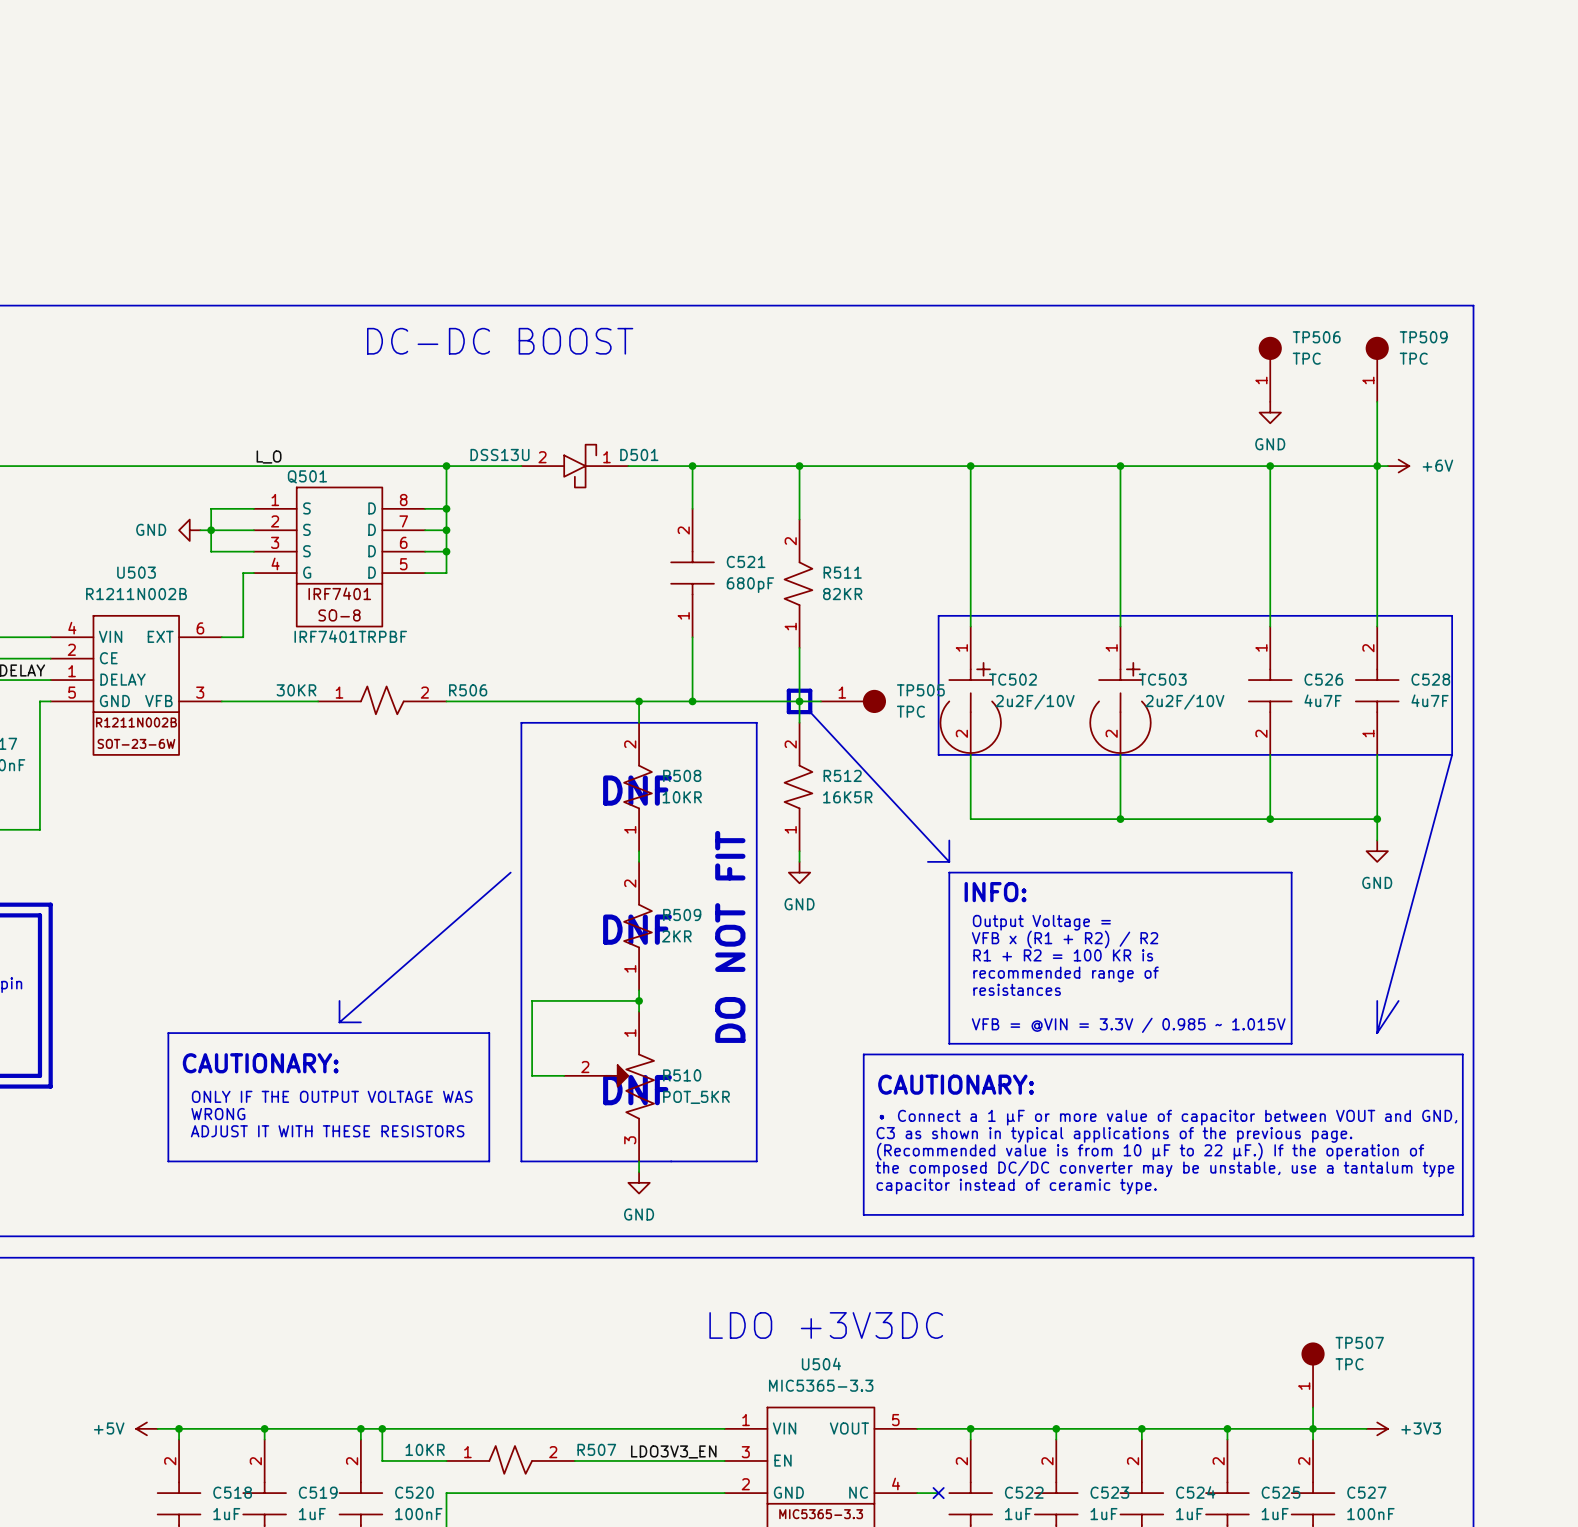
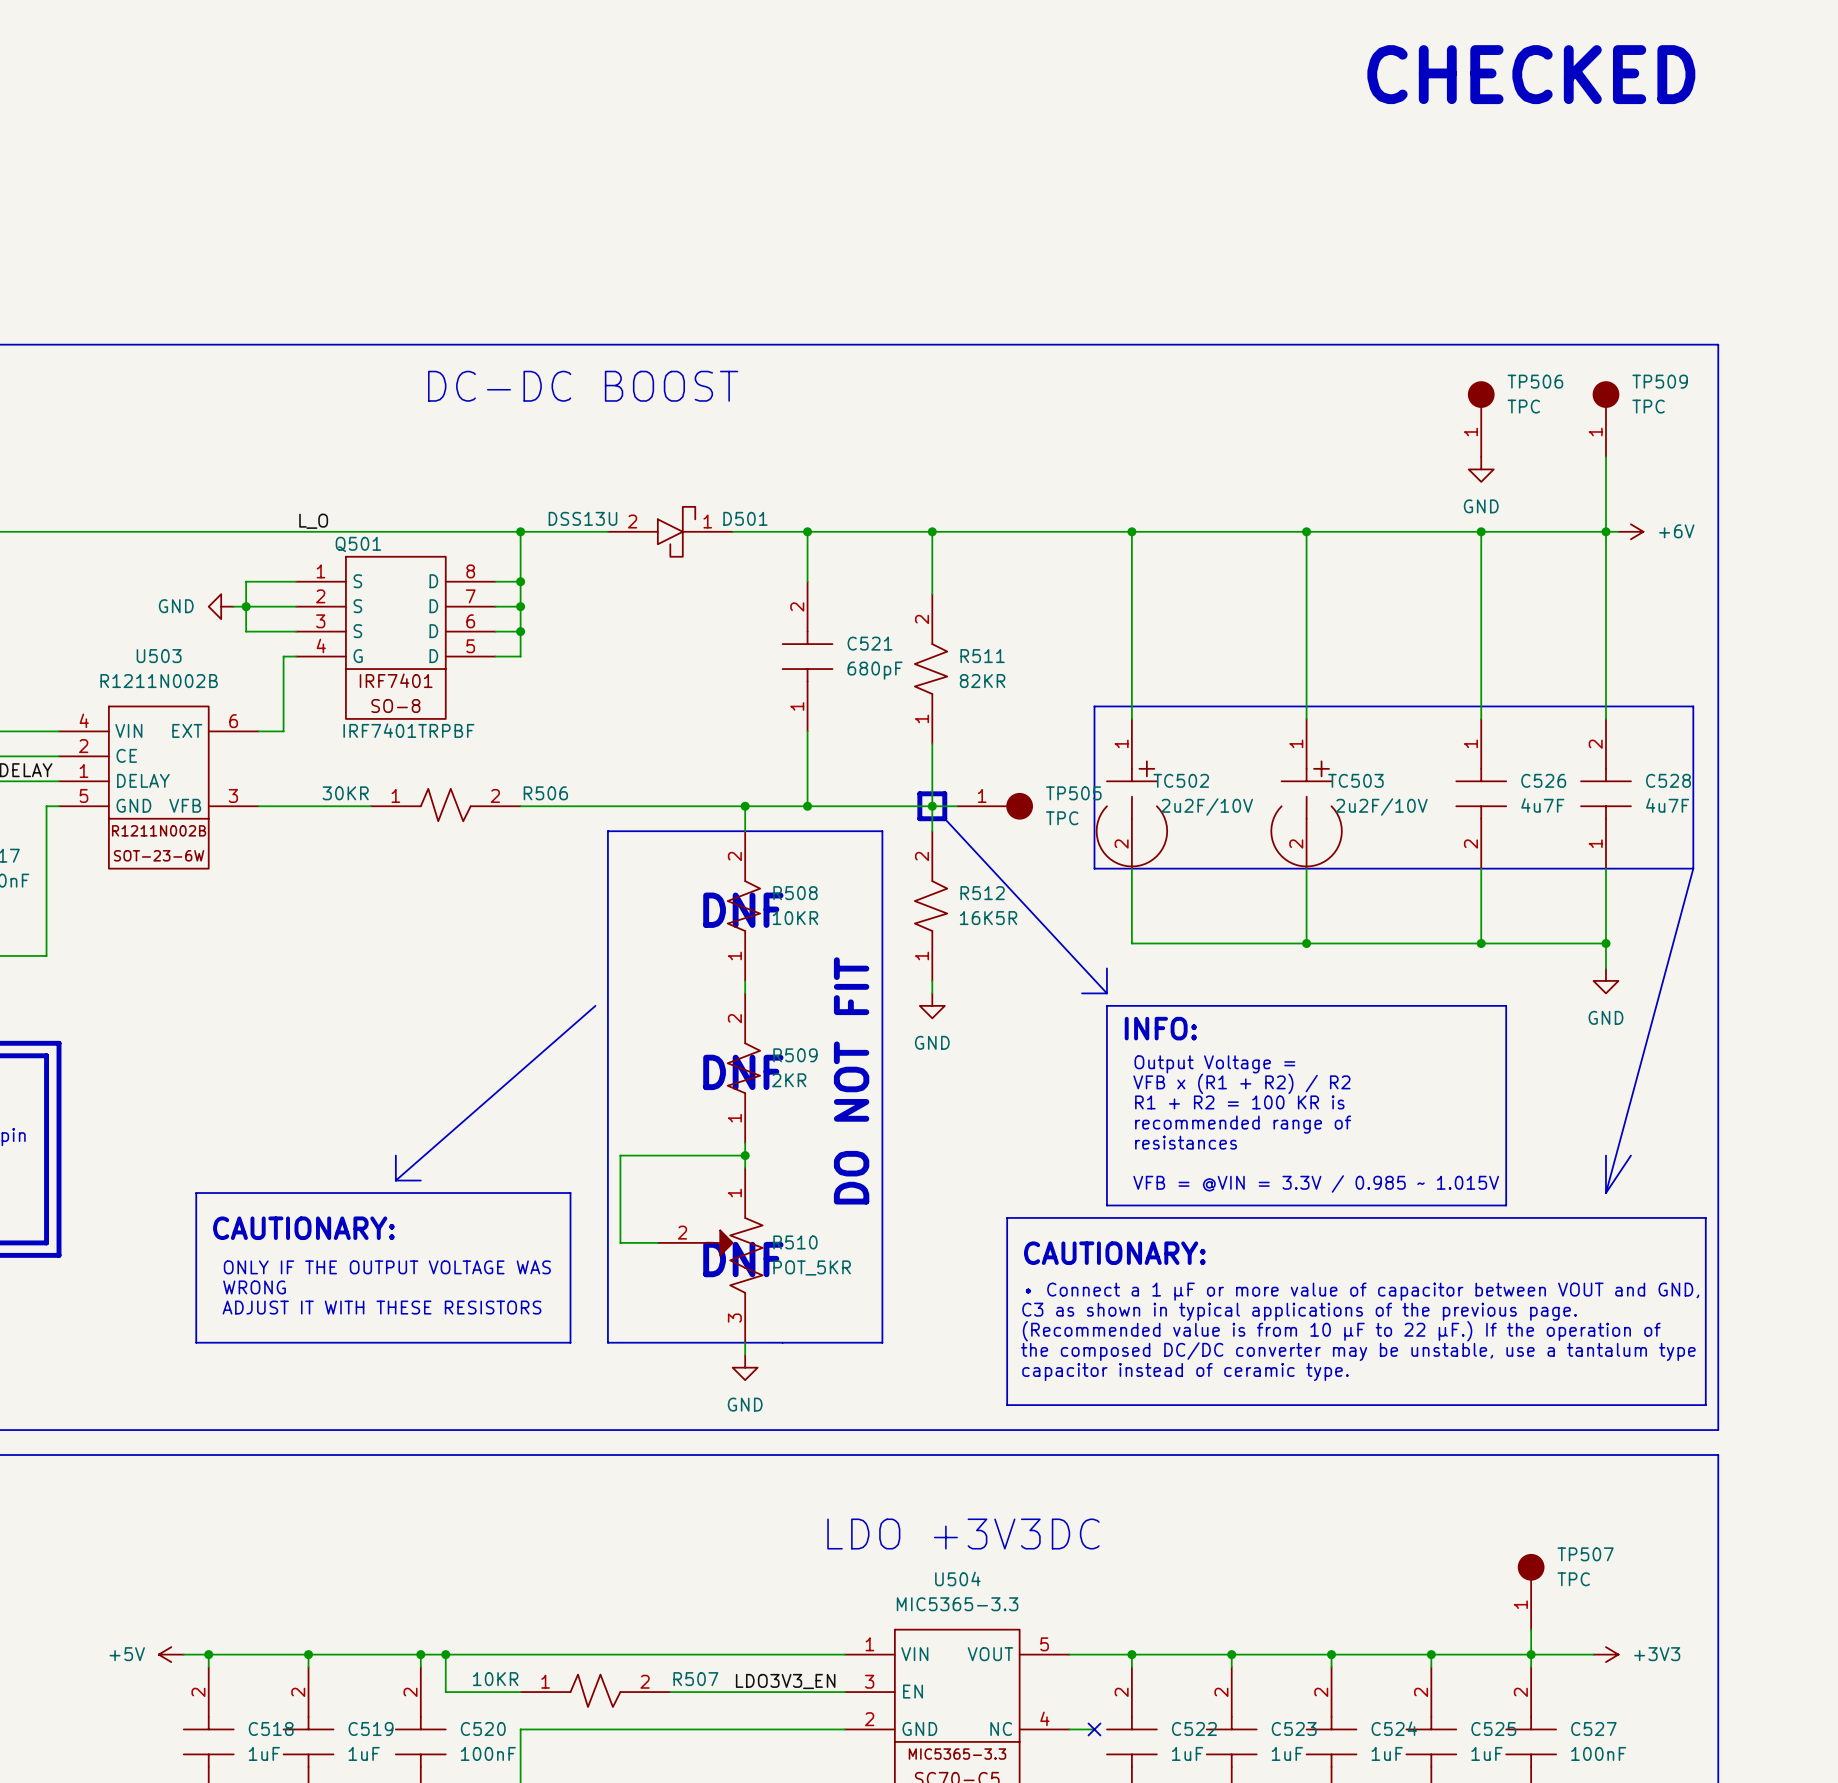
text: none -> CHECKED (1531, 74)

